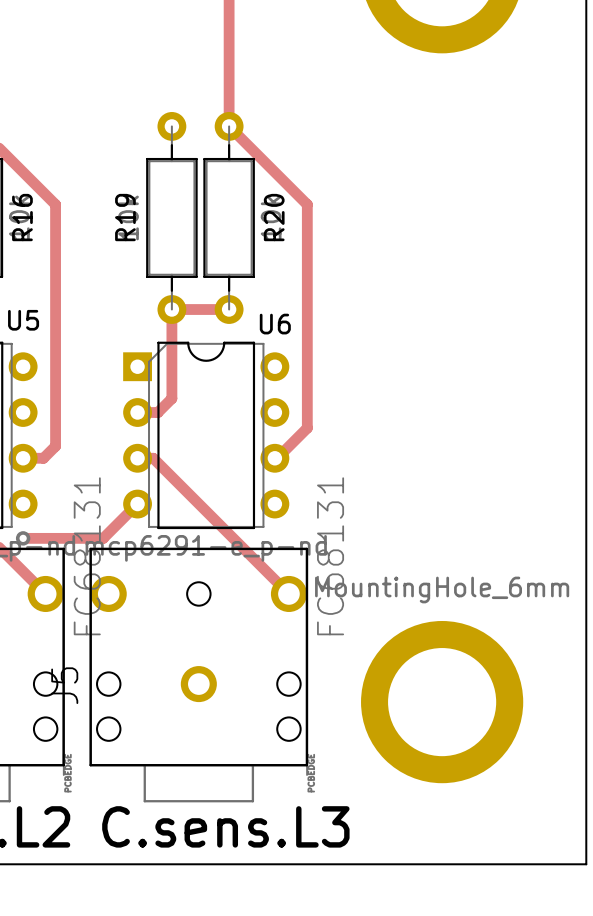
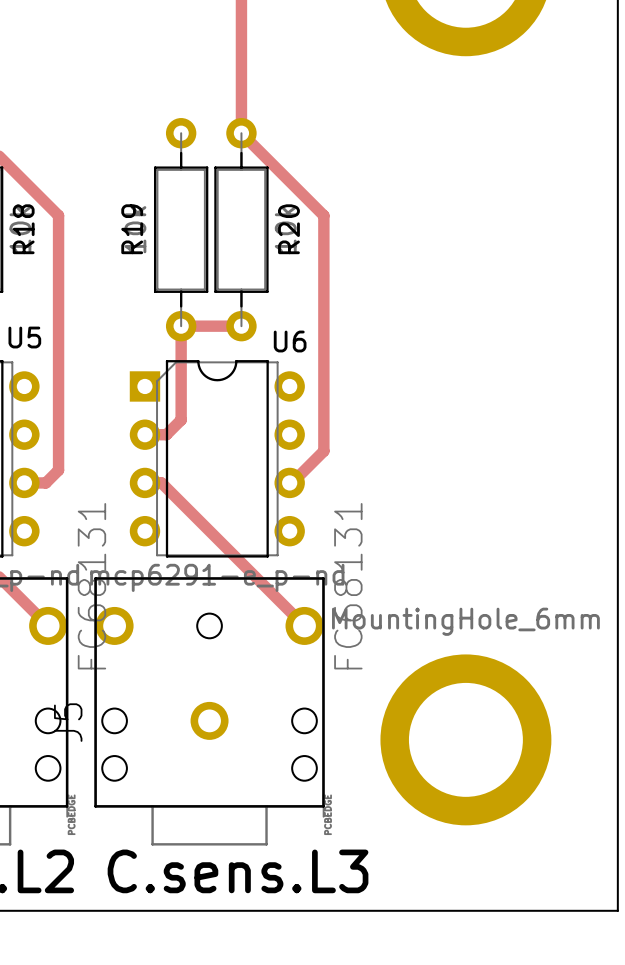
R16 name: R16 (22, 217) -> R18 (23, 229)
track: (137, 504) (103, 538) (23, 538) -> none
via: (23, 538) -> none

